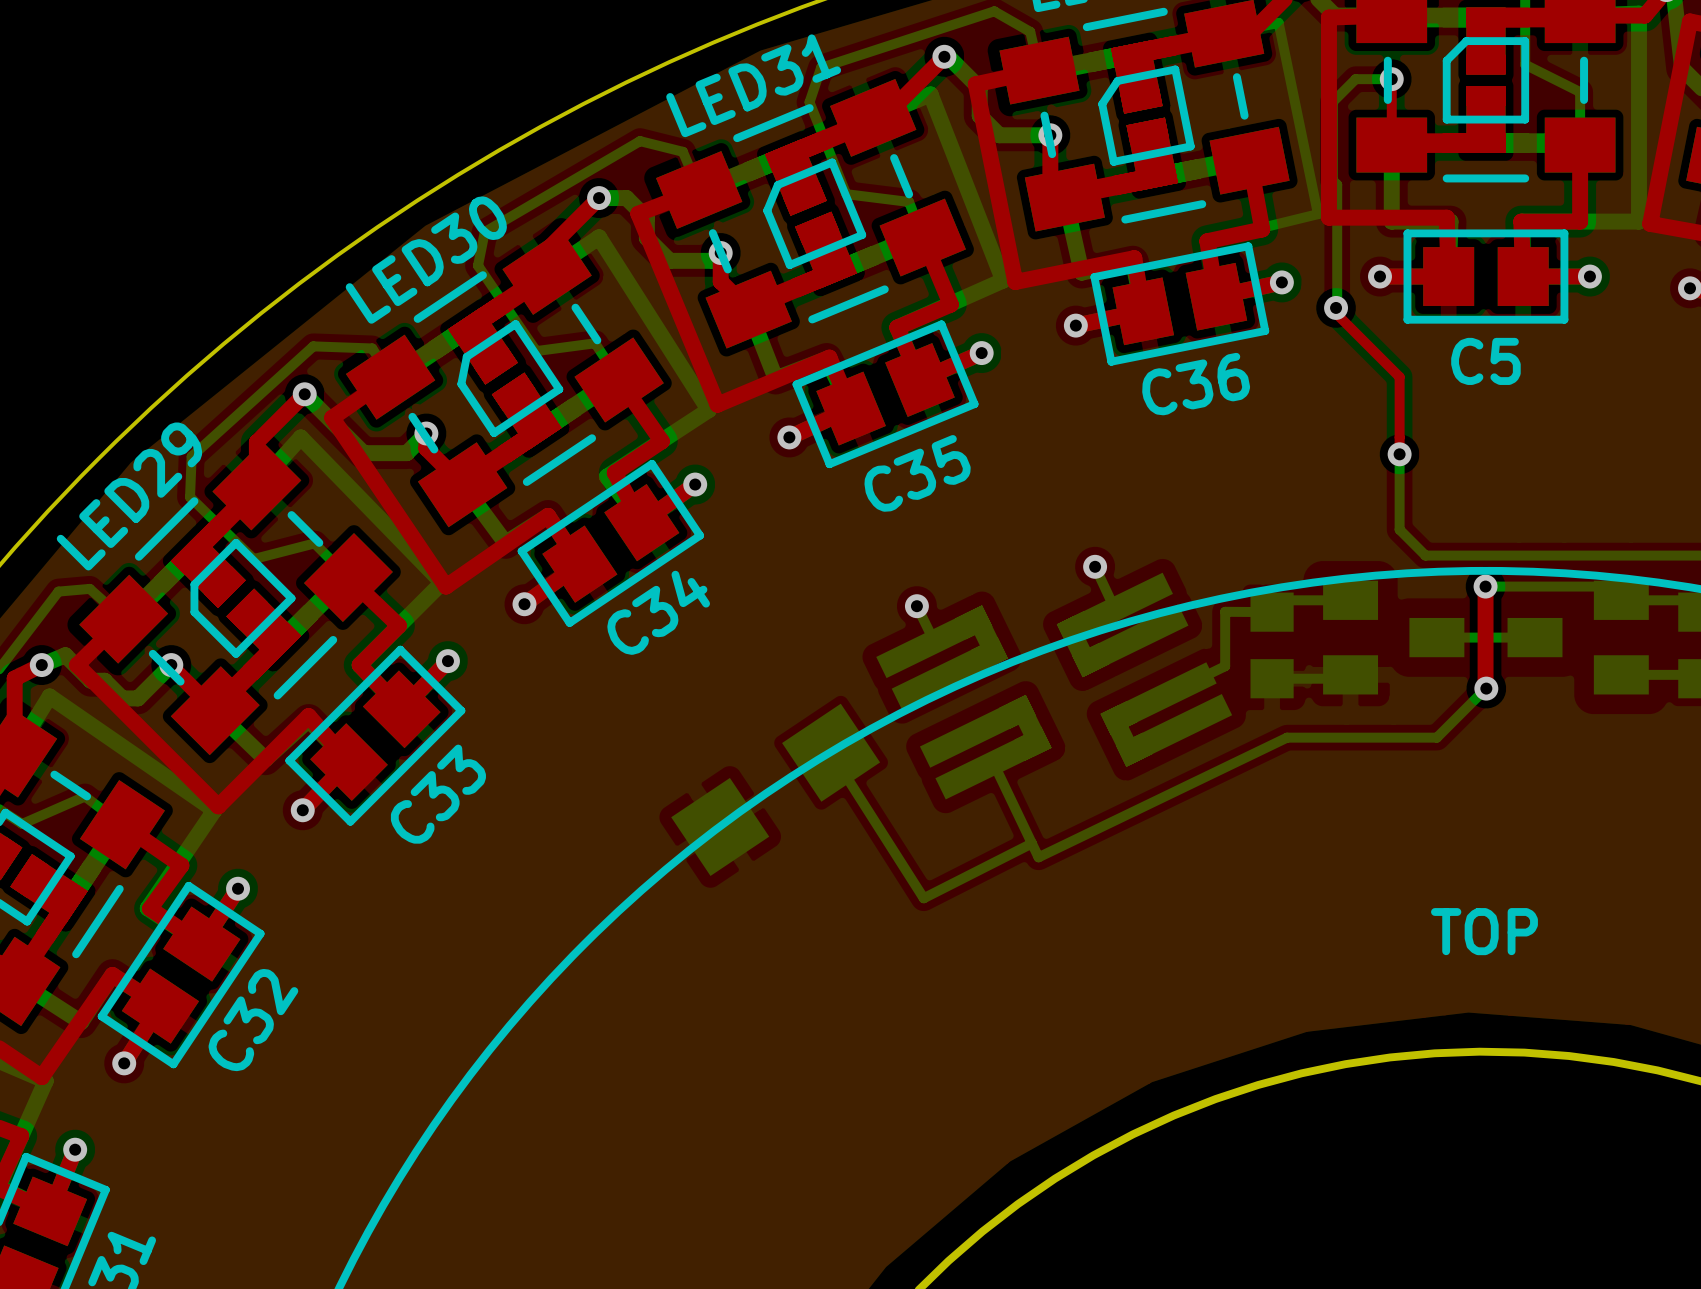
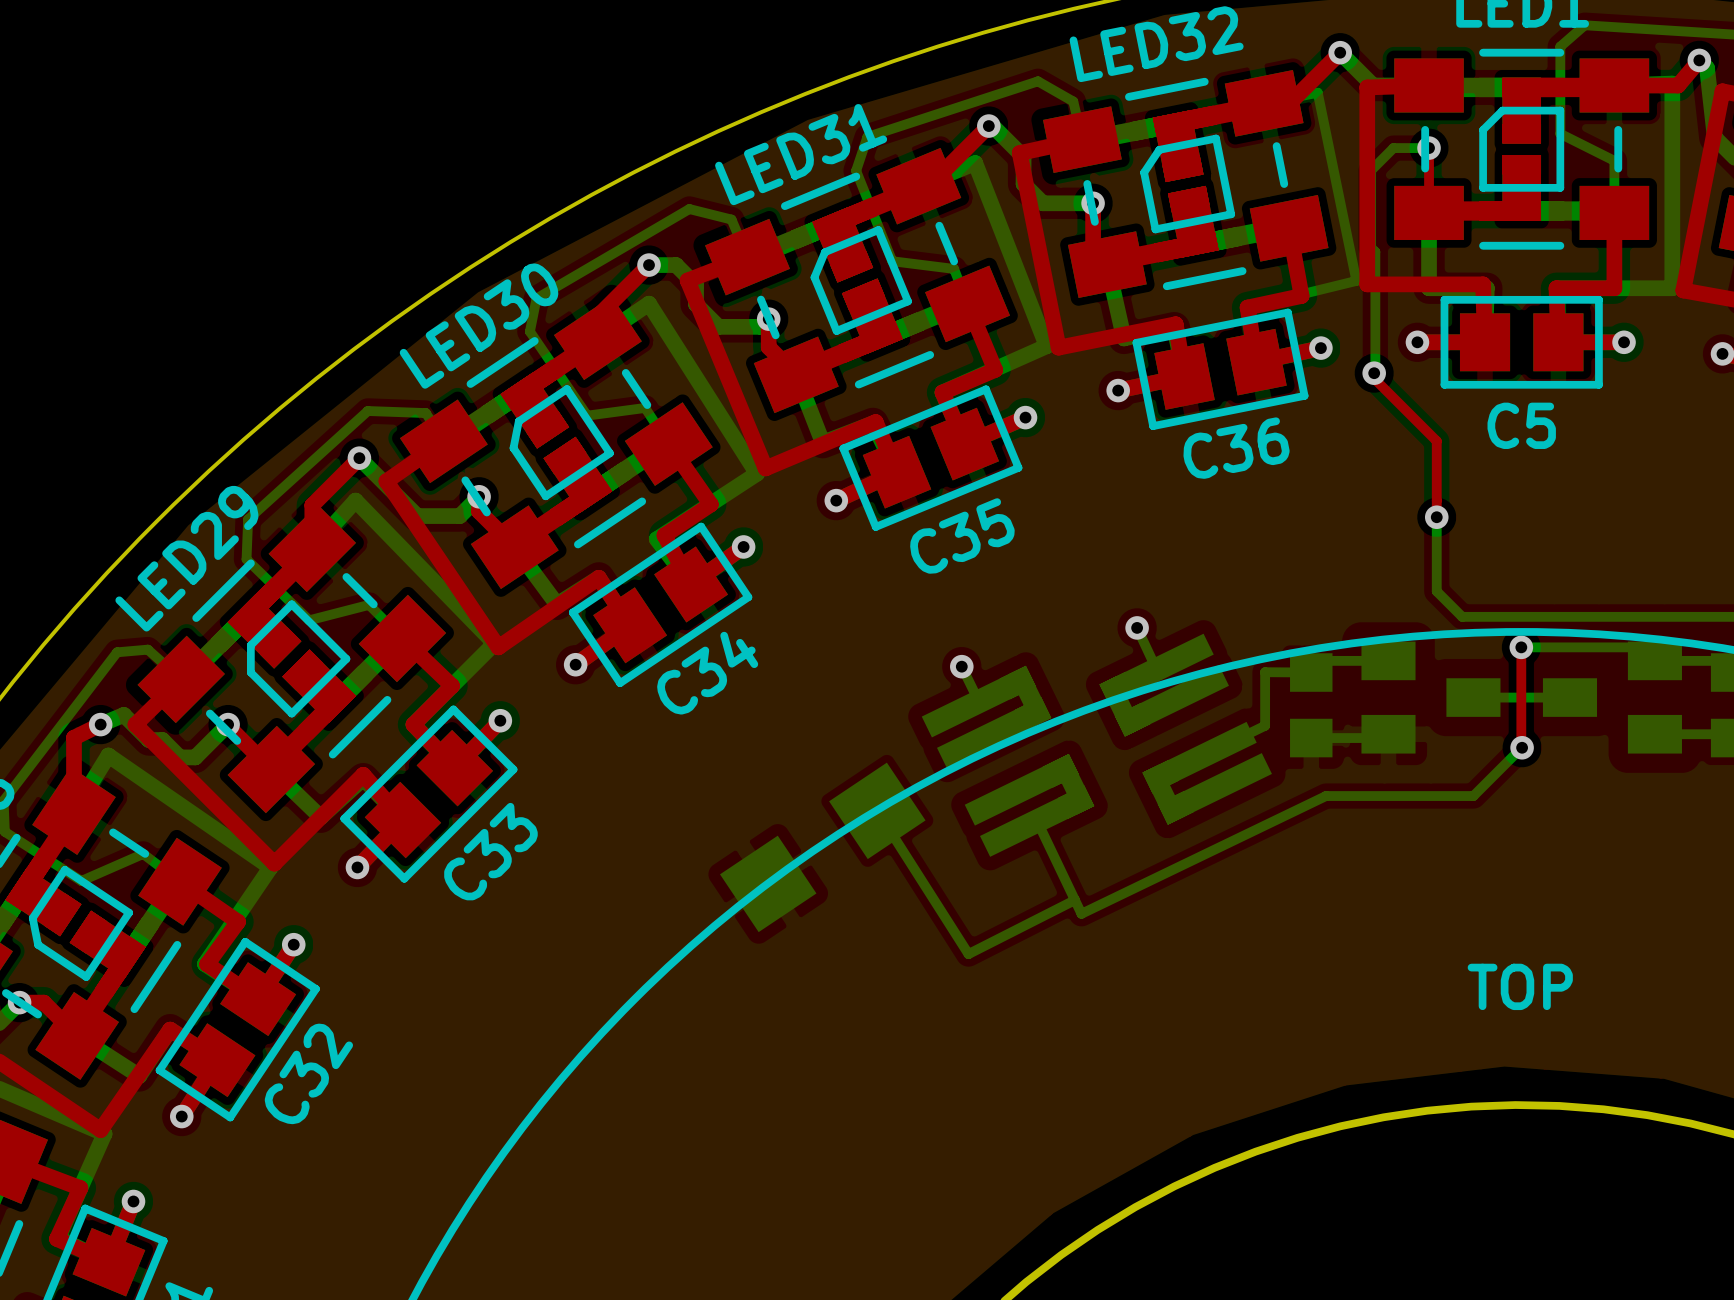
top track width: thick (1485, 586) (1485, 687) -> thin (1521, 647) (1521, 746)

